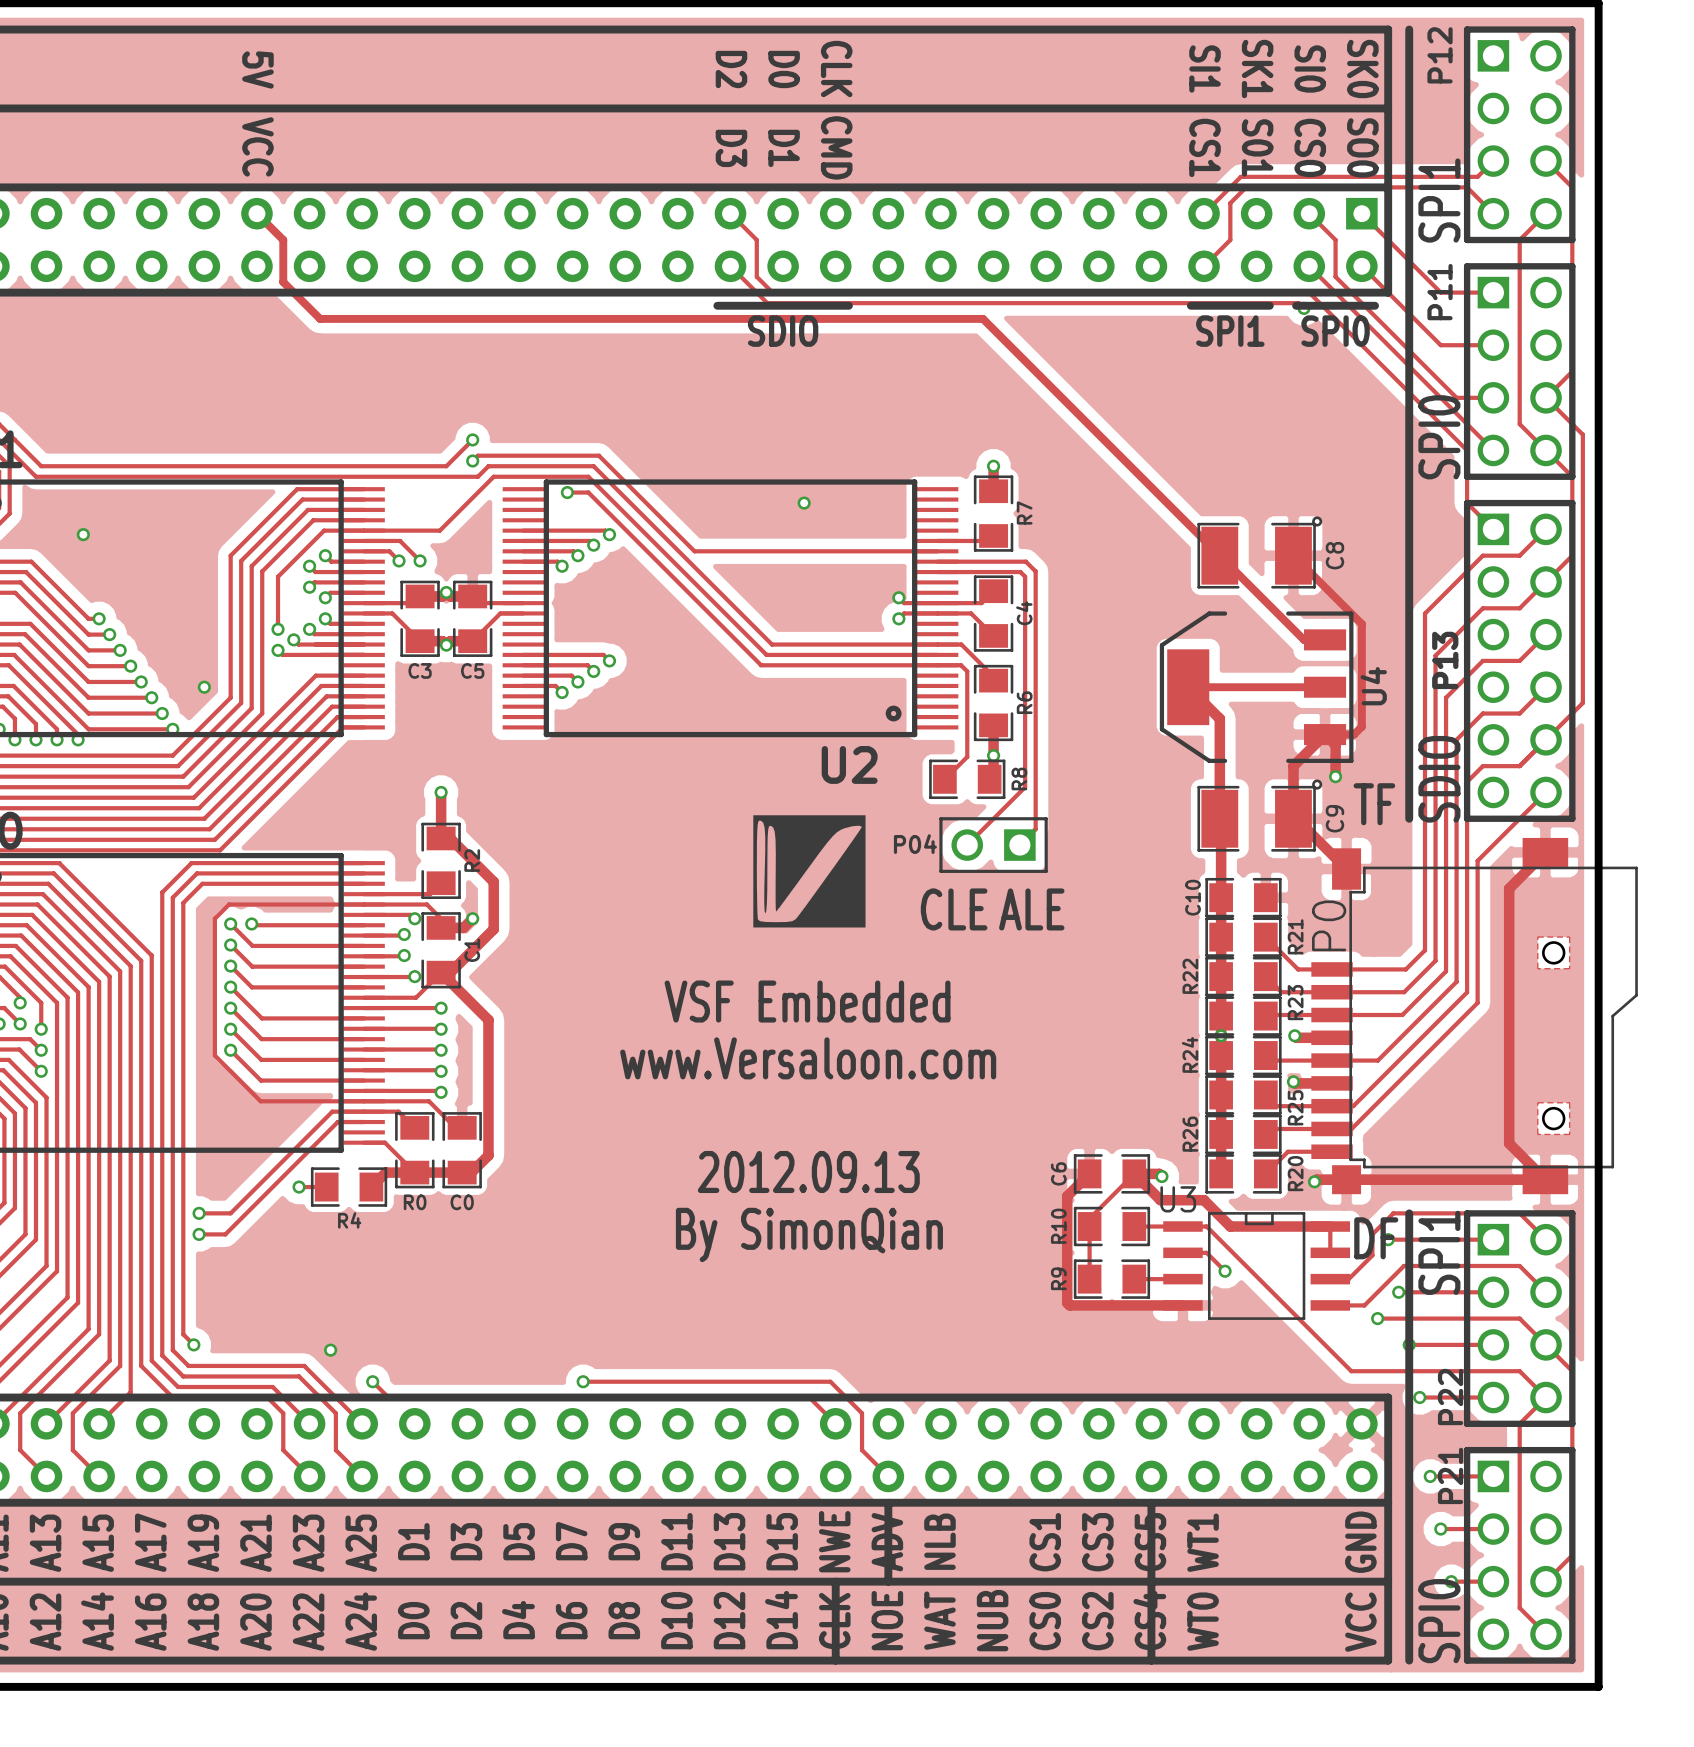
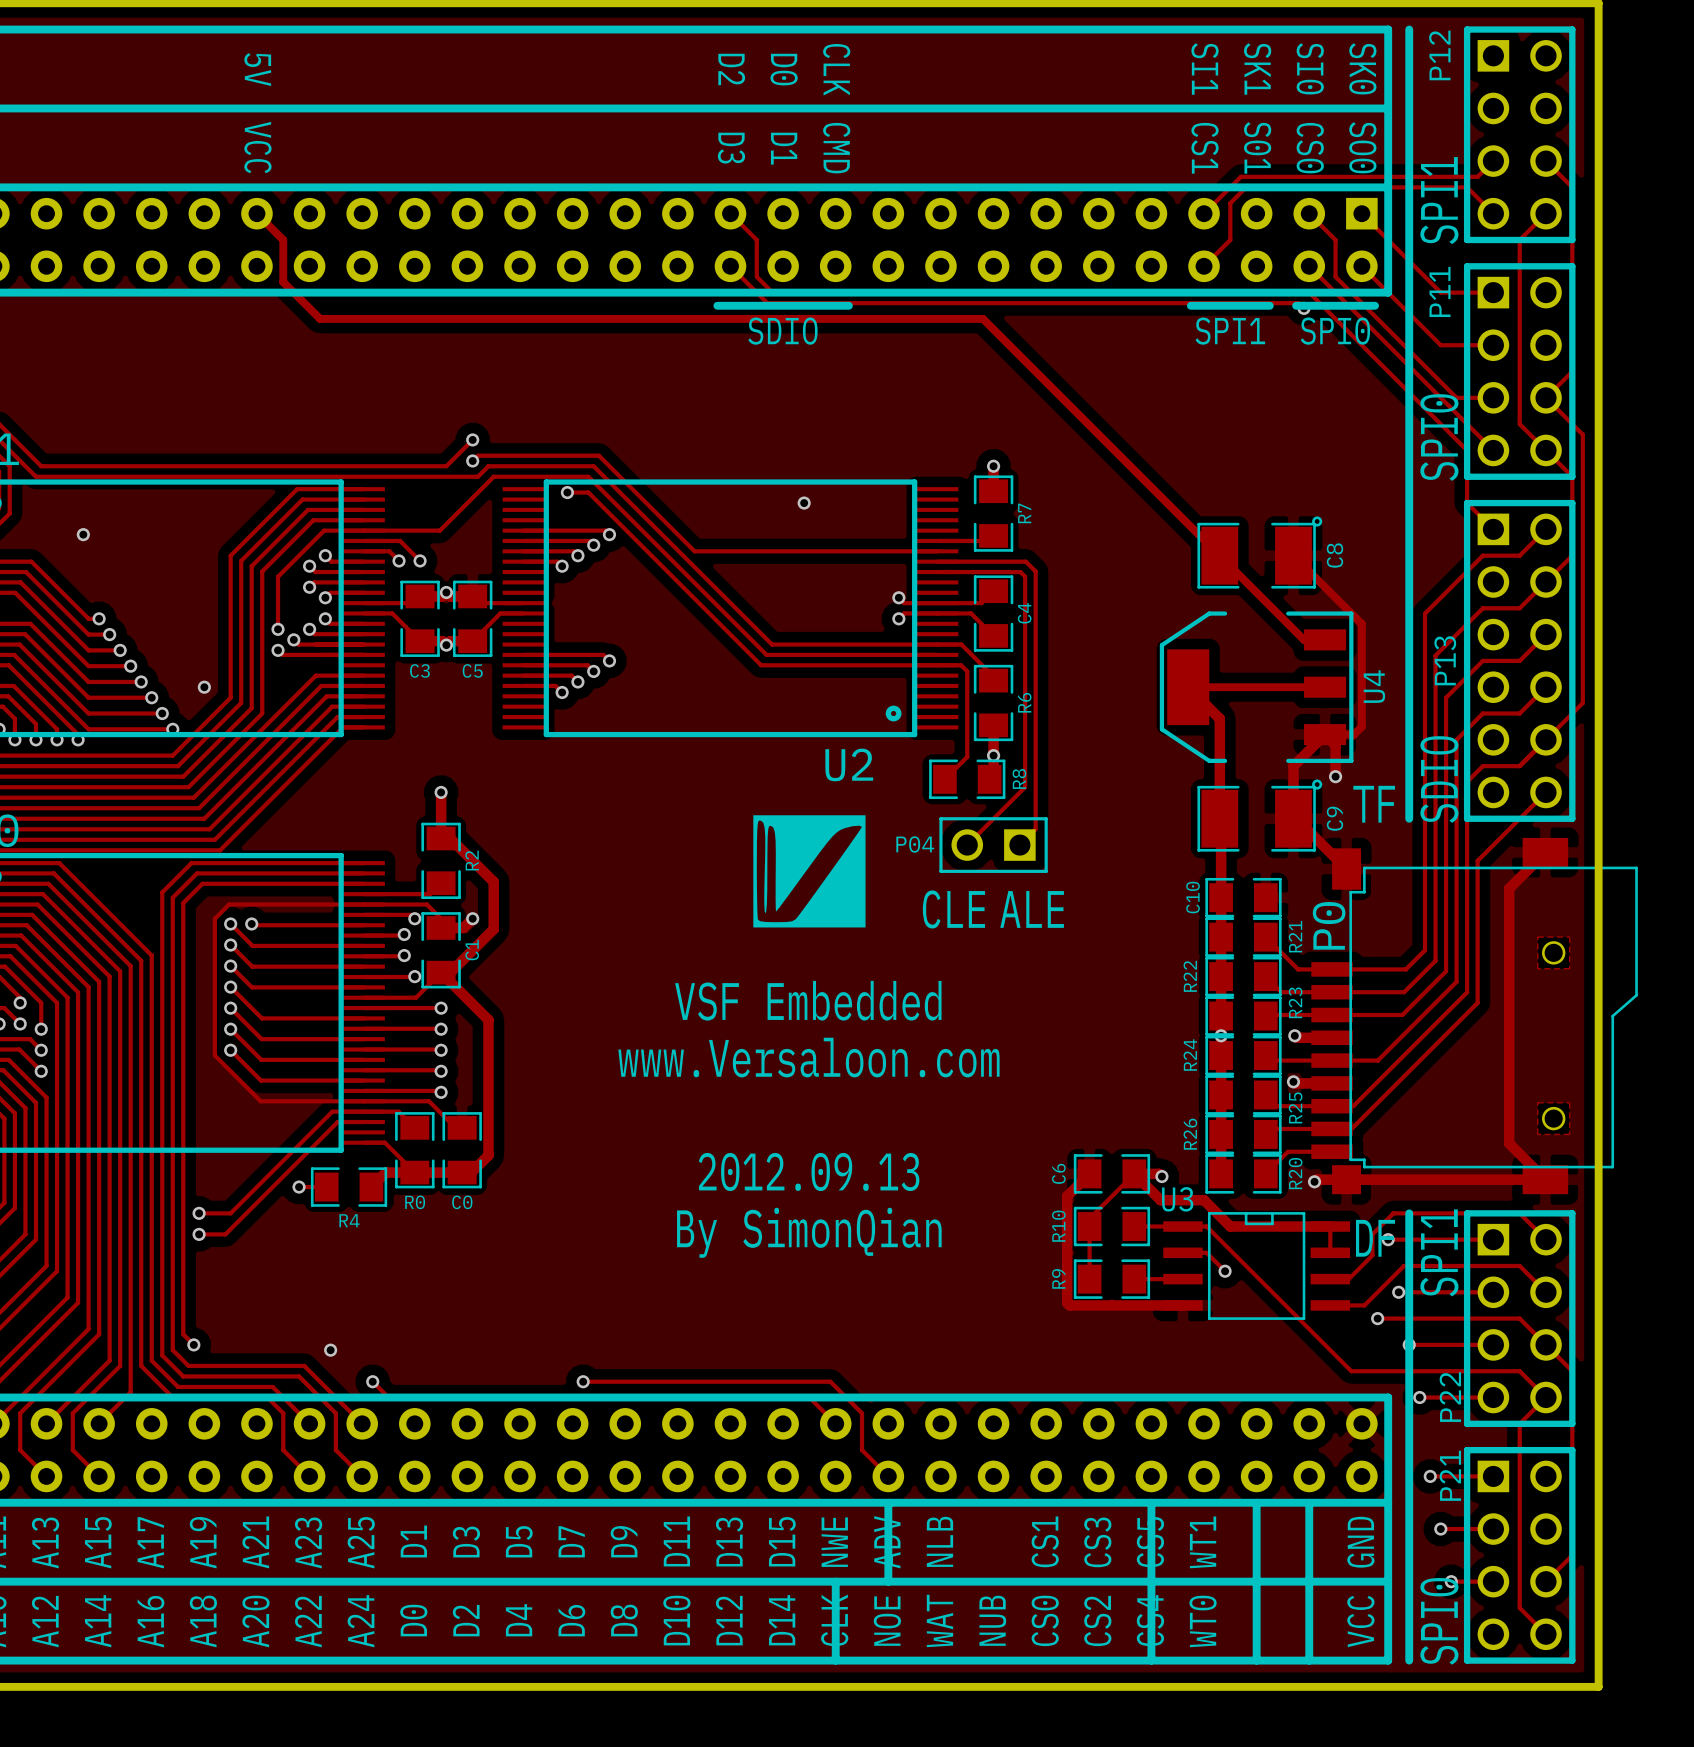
line: none -> (1256, 1502) (1256, 1660)
line: none -> (1309, 1502) (1309, 1660)

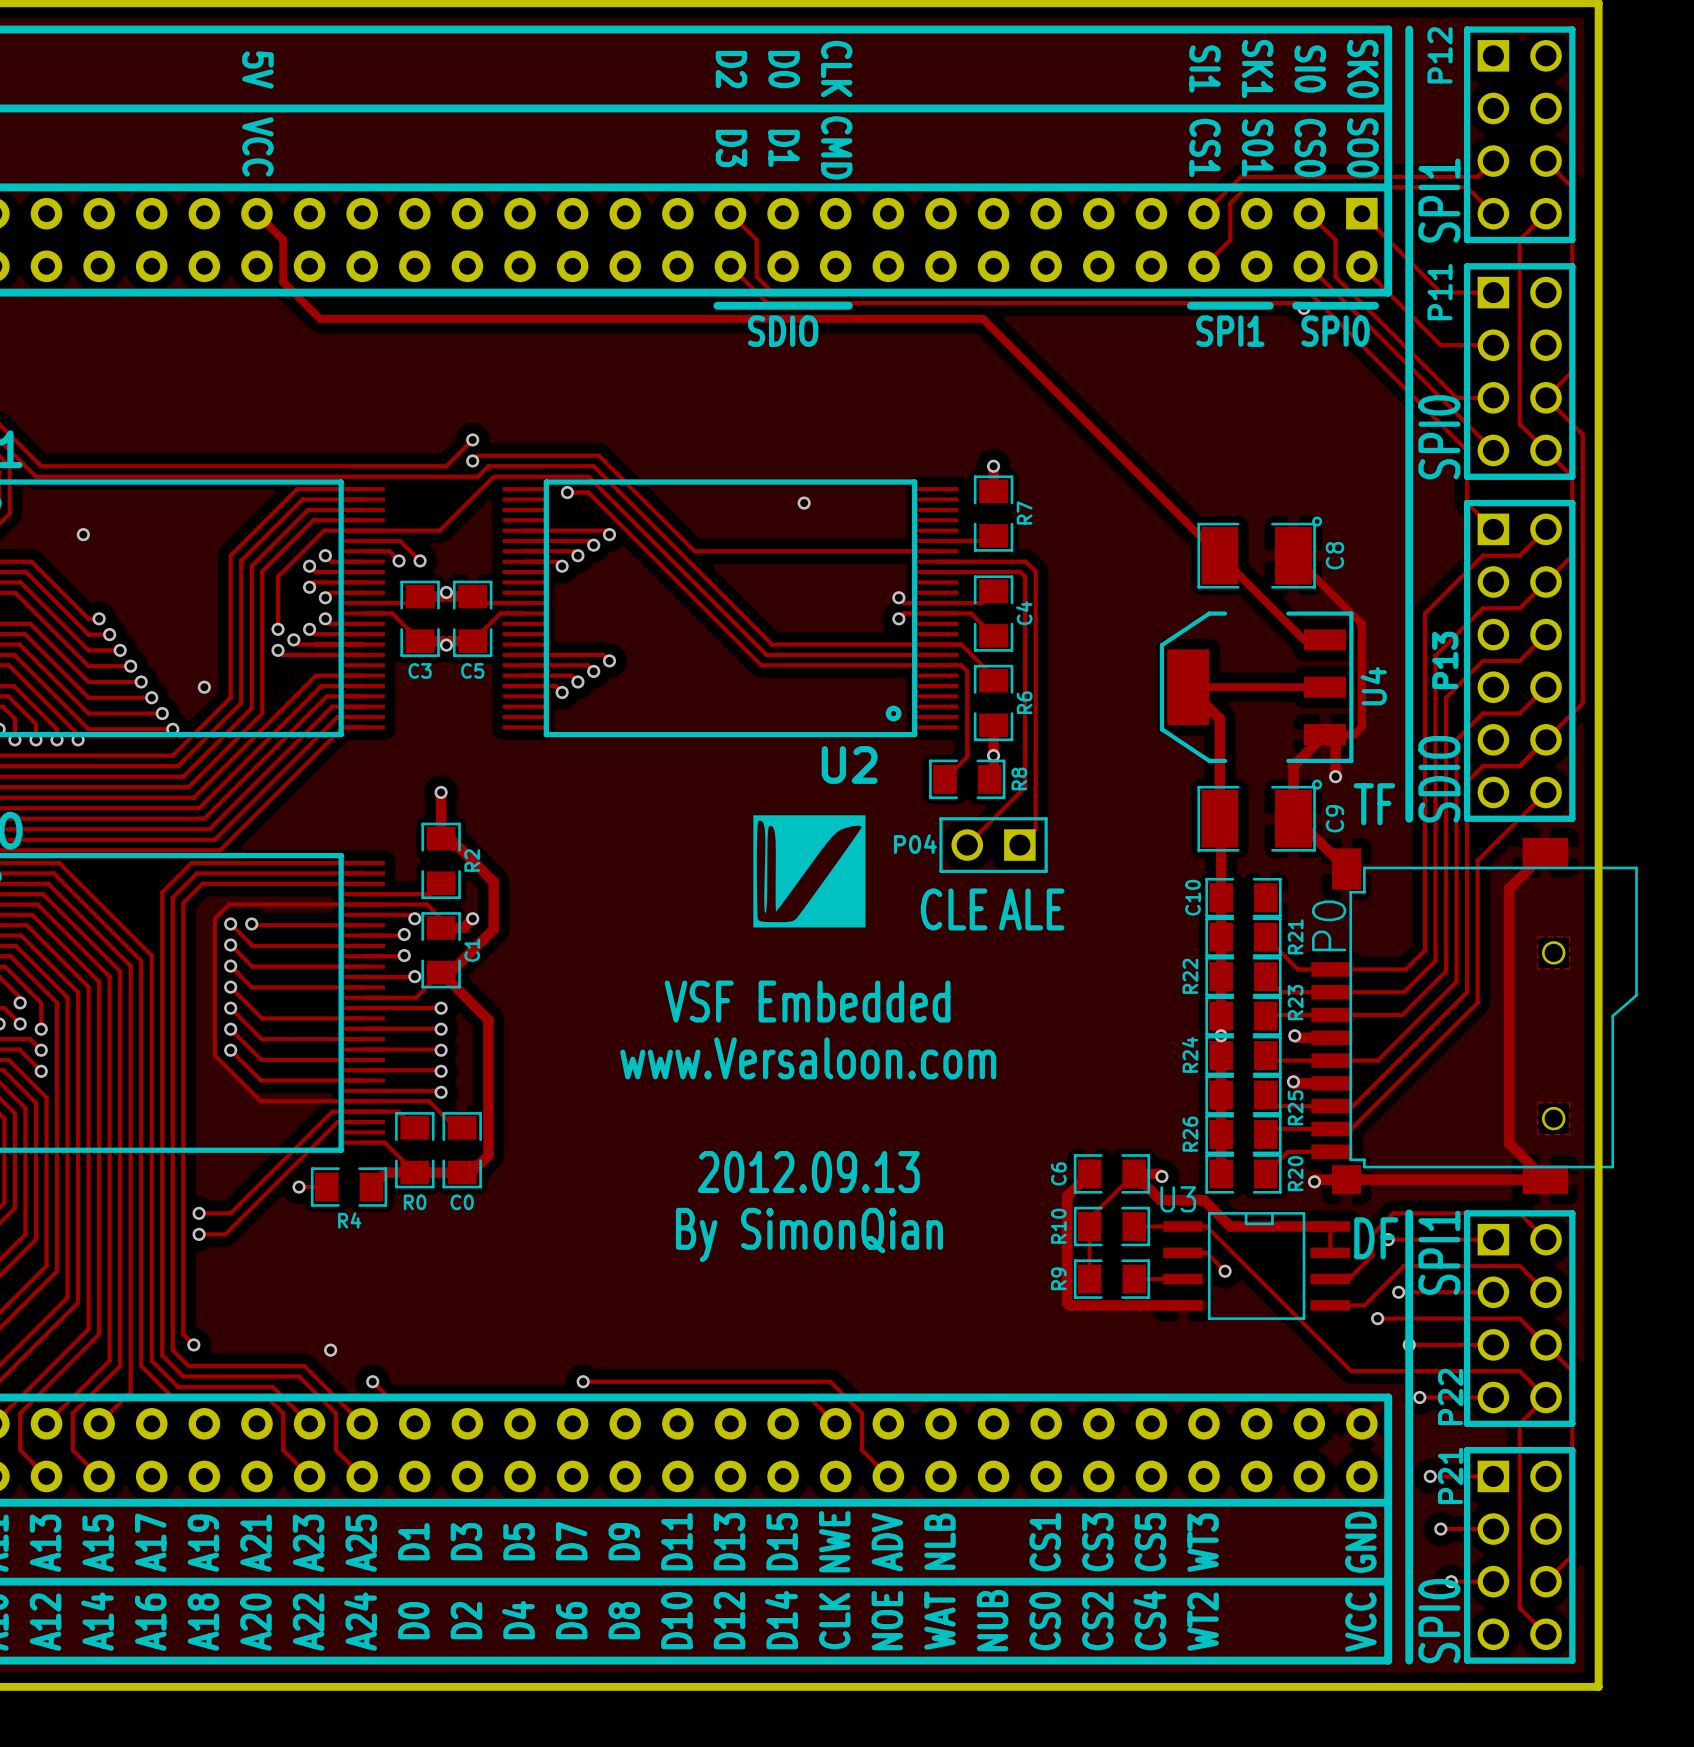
line: (888, 1502) (888, 1581) -> none
line: (1151, 1502) (1151, 1660) -> none
line: (1256, 1502) (1256, 1660) -> none
line: (1309, 1502) (1309, 1660) -> none
text: WT1 (1203, 1542) -> WT3 (1203, 1542)
line: (835, 1581) (835, 1660) -> none
text: WT0 (1203, 1621) -> WT2 (1203, 1621)

